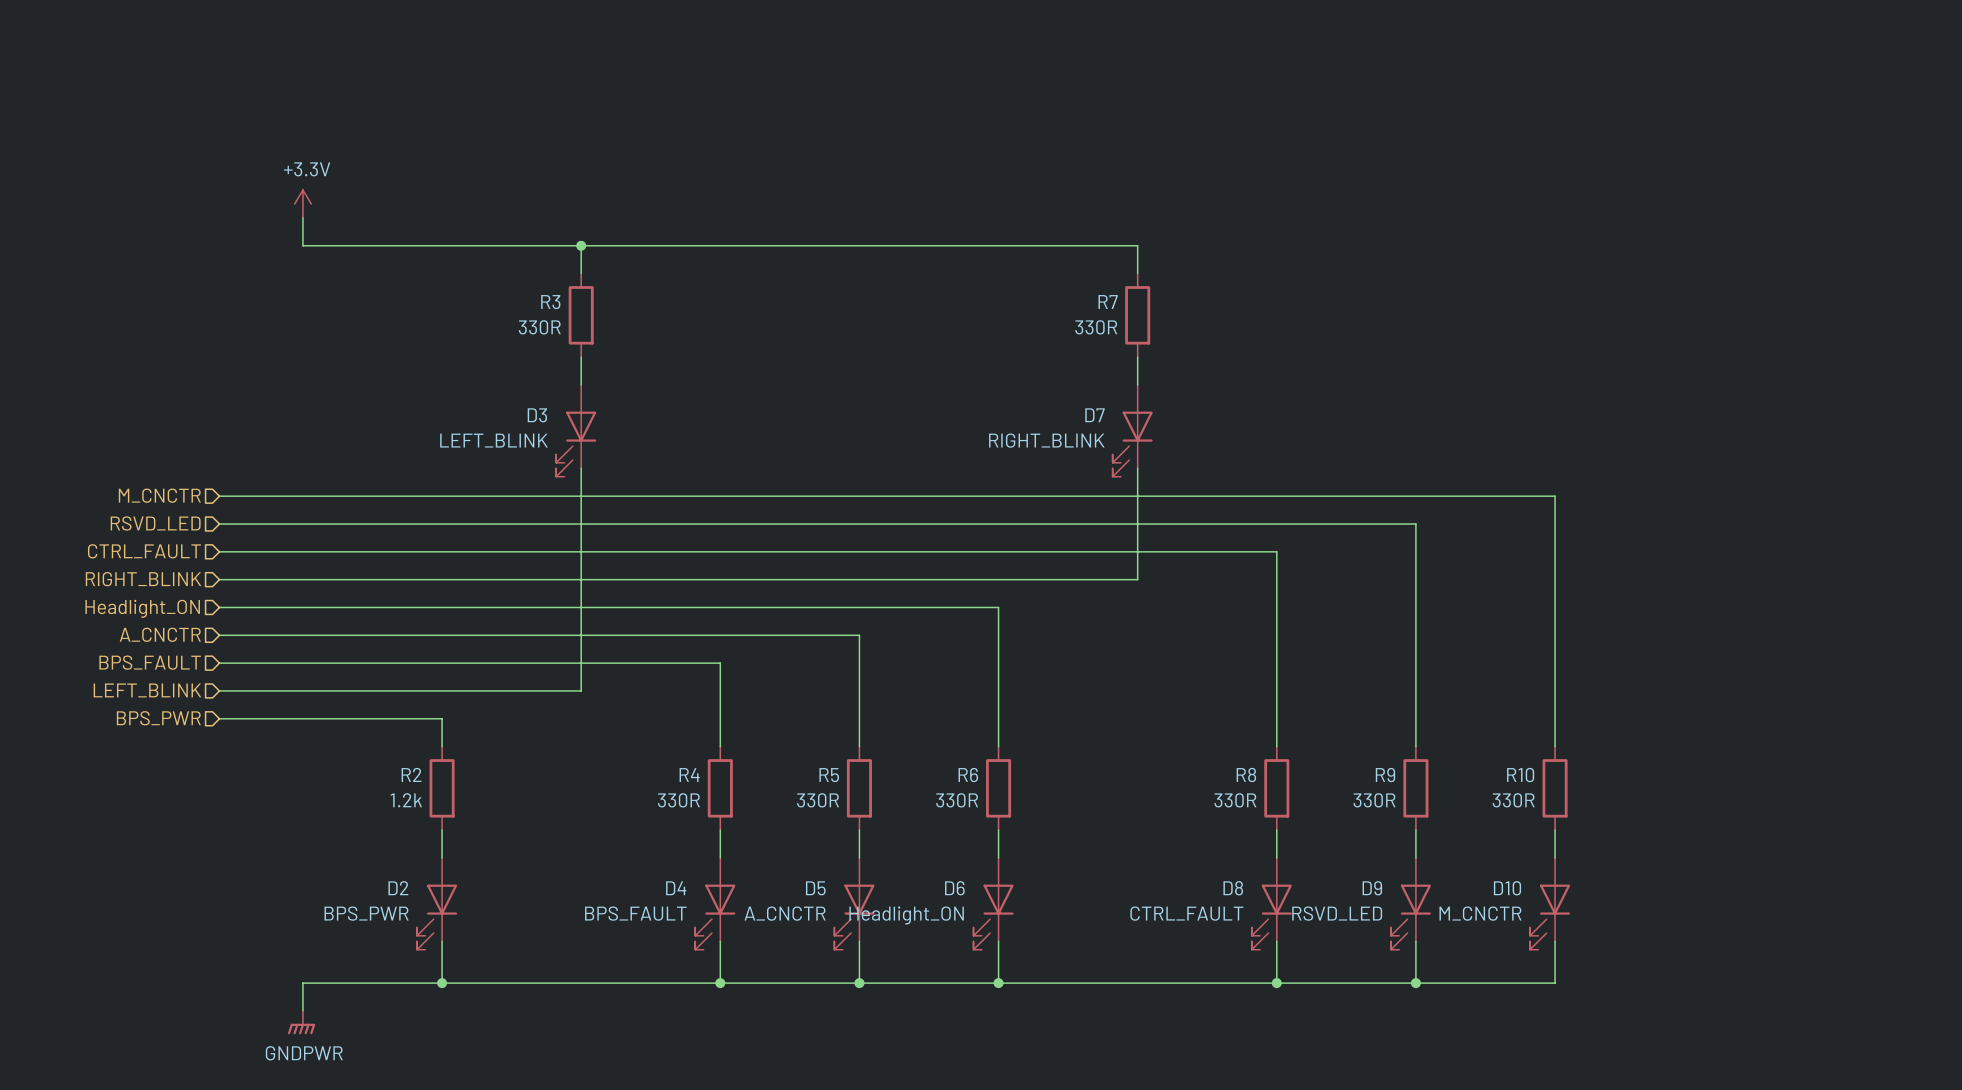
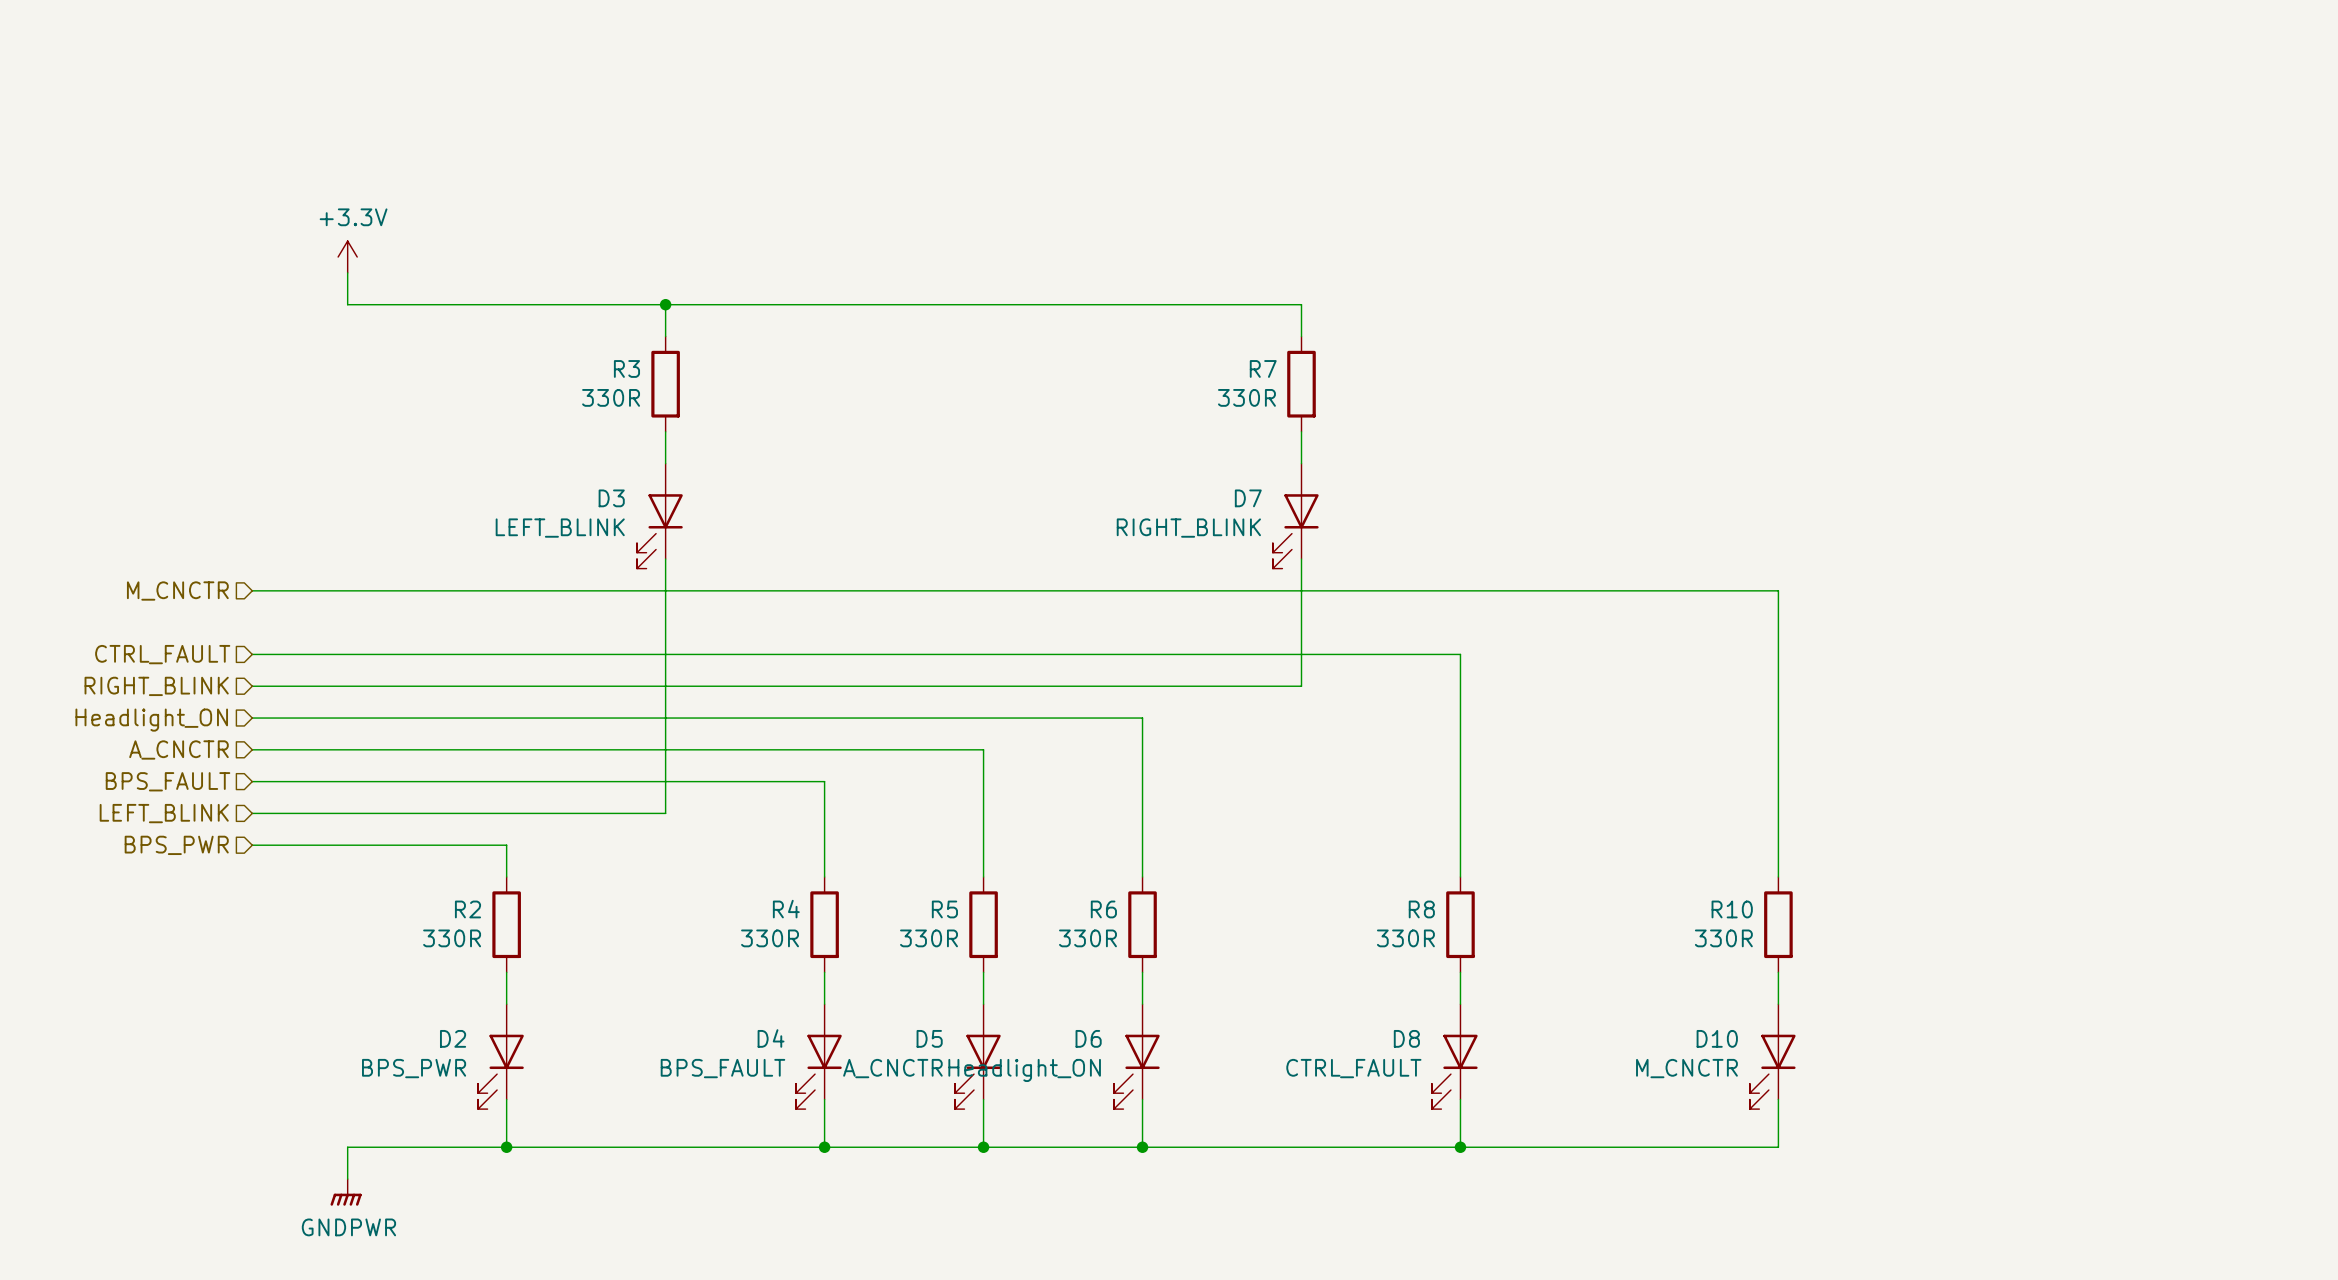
hierarchical label: RSVD_LED (155, 523) -> none
wire: (219, 524) (1415, 524) (1415, 746) -> none
R9: 330R (1415, 788) -> none
R2 value: 1.2k (406, 800) -> 330R (452, 938)
wire: (1415, 830) (1415, 857) -> none
D9: RSVD_LED (1410, 903) -> none
wire: (1415, 941) (1415, 983) -> none
junction: (1415, 983) -> none

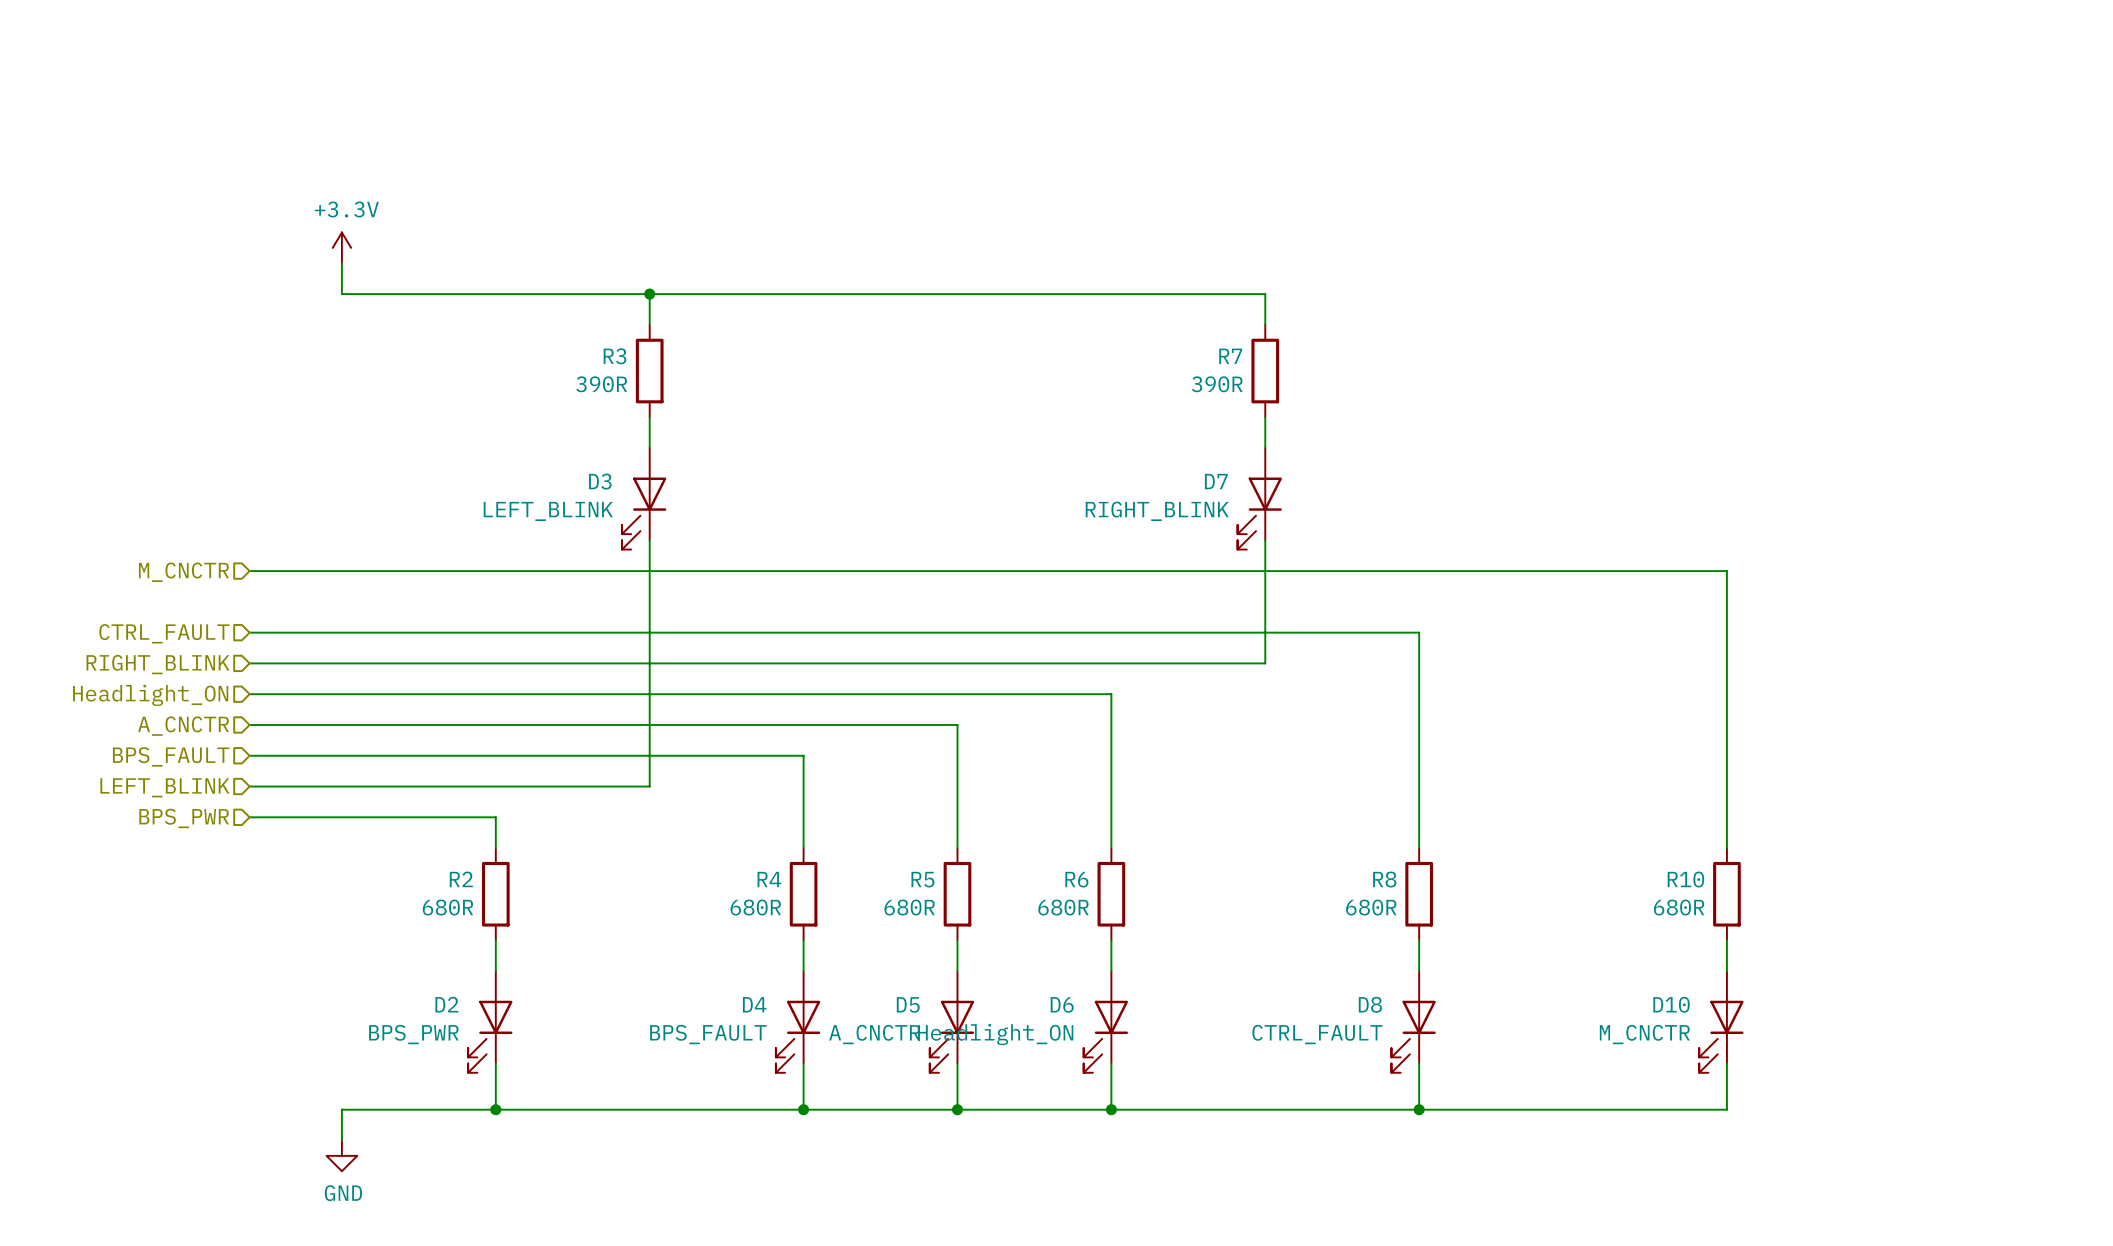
R3 value: 330R (611, 397) -> 390R (601, 384)
R7 value: 330R (1246, 397) -> 390R (1217, 384)
R2 value: 330R (452, 938) -> 680R (447, 907)
R4 value: 330R (770, 938) -> 680R (755, 907)
R5 value: 330R (929, 938) -> 680R (909, 907)
R6 value: 330R (1087, 938) -> 680R (1063, 907)
R8 value: 330R (1405, 938) -> 680R (1371, 907)
R10 value: 330R (1723, 938) -> 680R (1679, 907)
power symbol: GNDPWR (346, 1192) -> GND (341, 1155)

